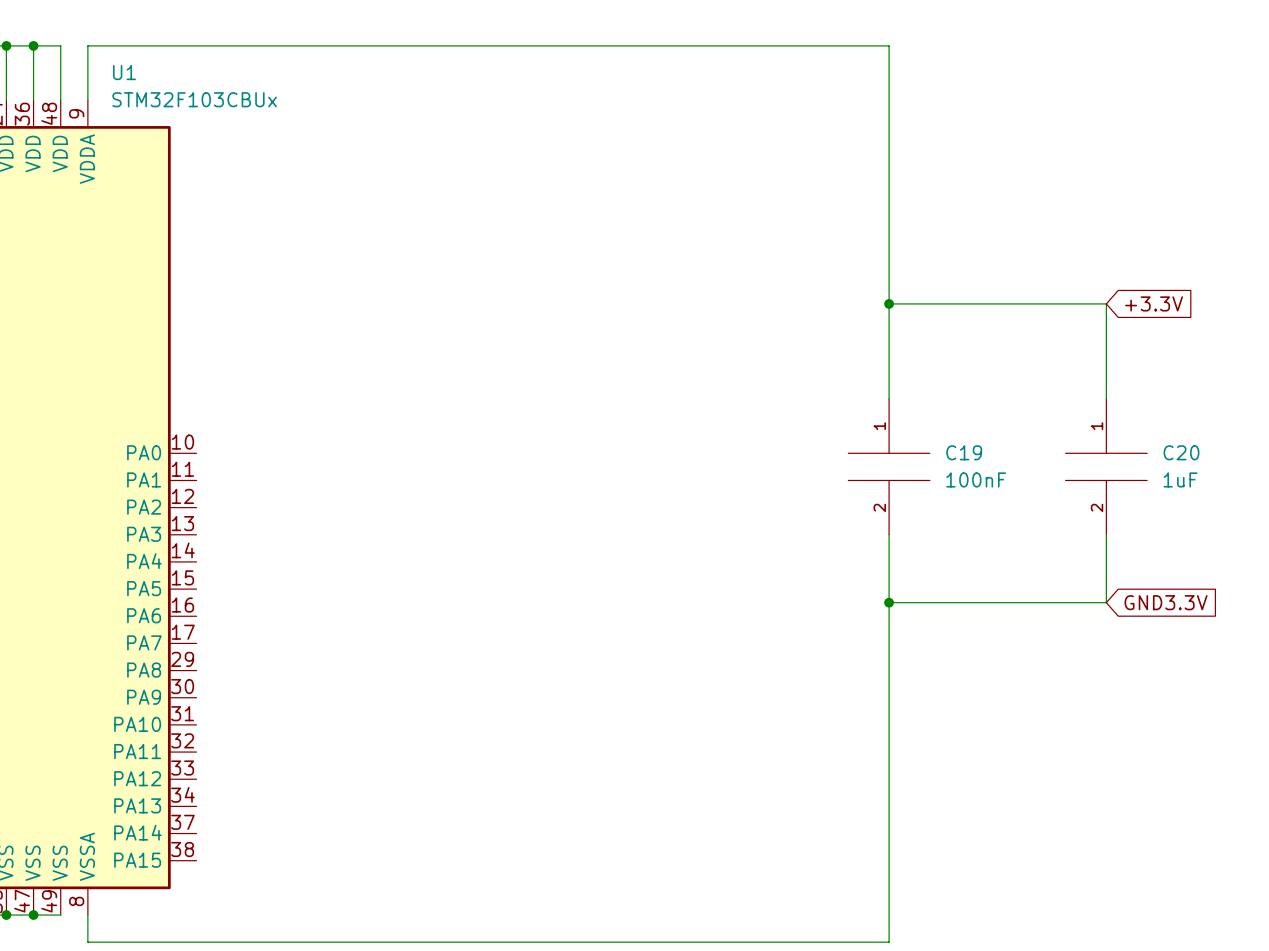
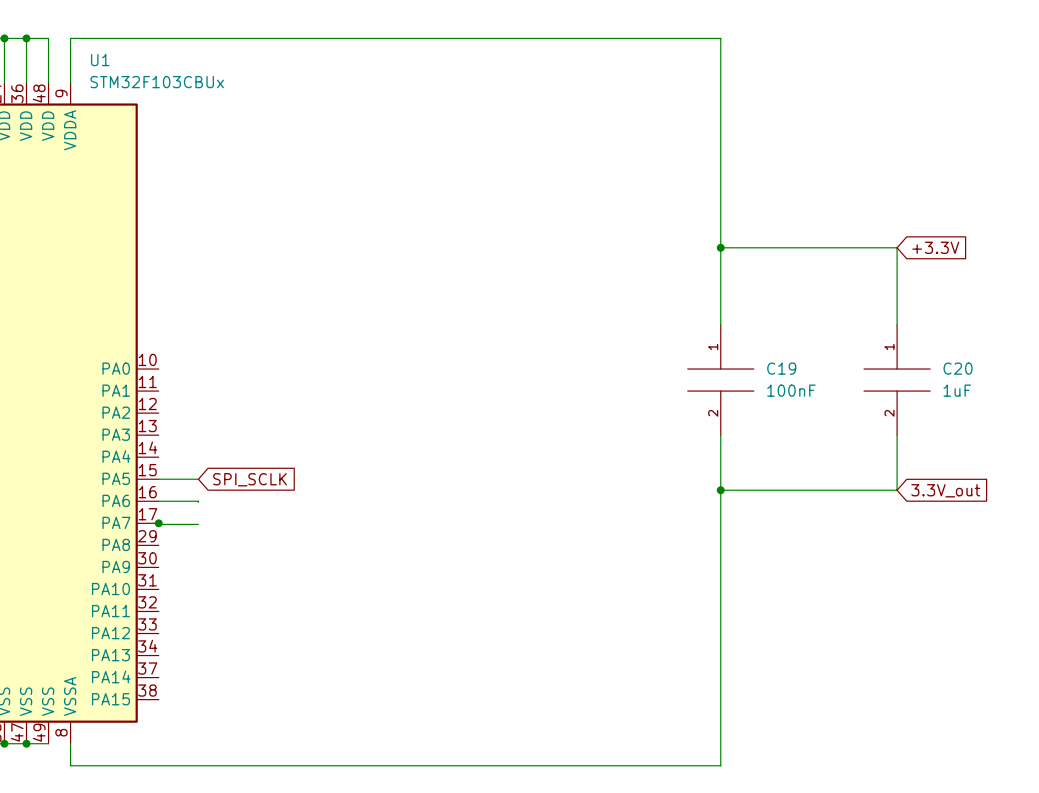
wire: none -> (158, 479) (198, 479)
global label: none -> SPI_SCLK (249, 479)
global label: GND3.3V (1166, 602) -> 3.3V_out (945, 490)
wire: none -> (158, 501) (198, 502)
wire: none -> (158, 523) (198, 524)
junction: none -> (158, 523)

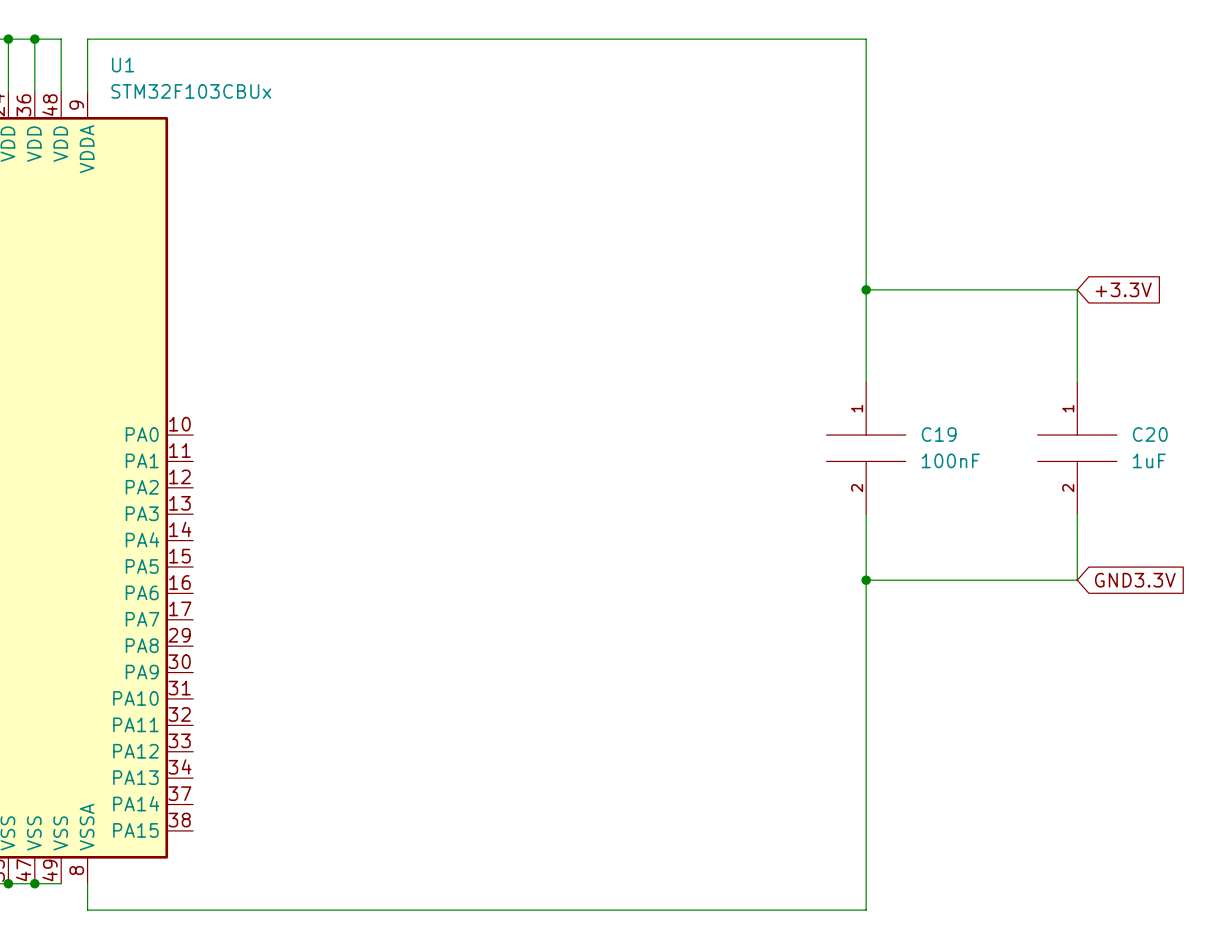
wire: (158, 479) (198, 479) -> none
global label: SPI_SCLK (249, 479) -> none
global label: 3.3V_out (945, 490) -> GND3.3V (1135, 580)
wire: (158, 501) (198, 502) -> none
wire: (158, 523) (198, 524) -> none
junction: (158, 523) -> none

